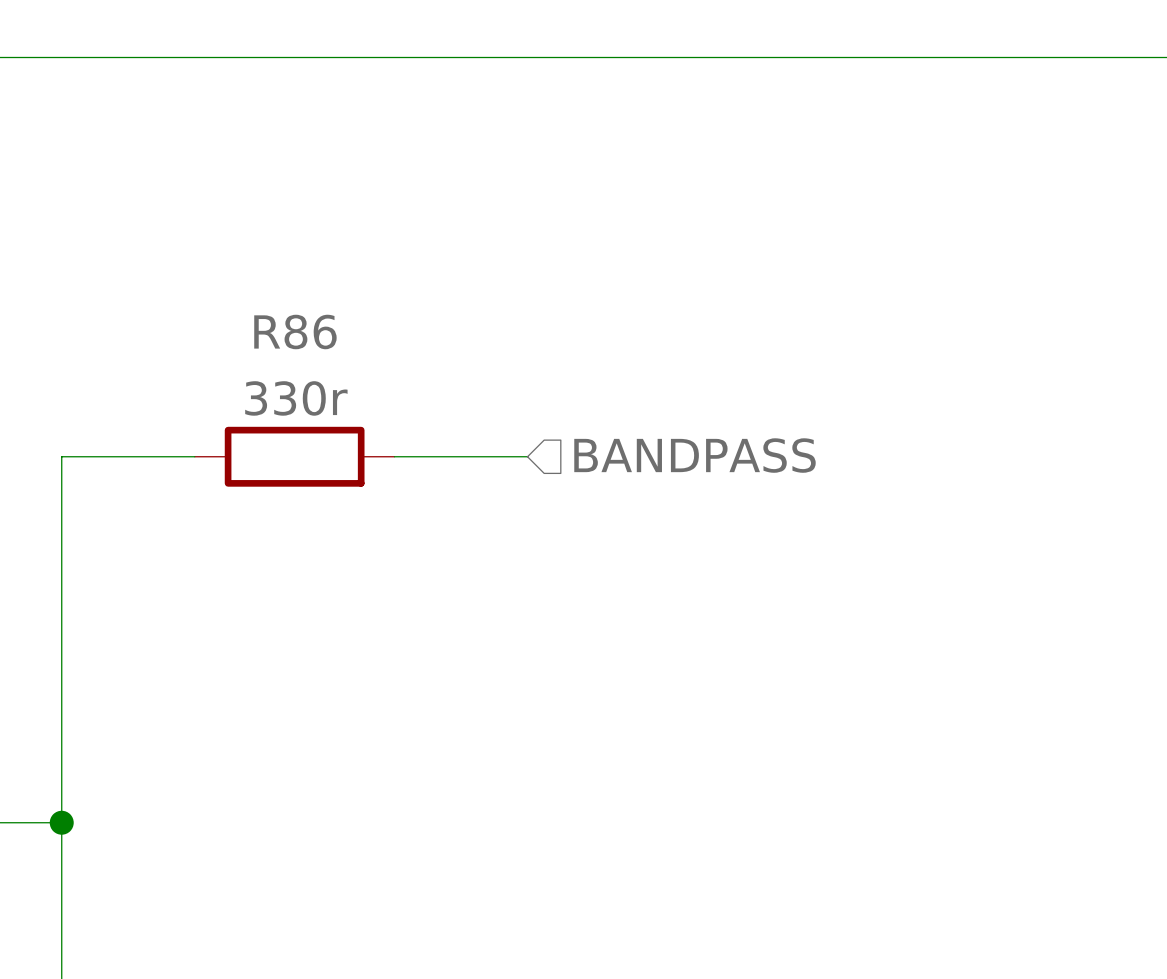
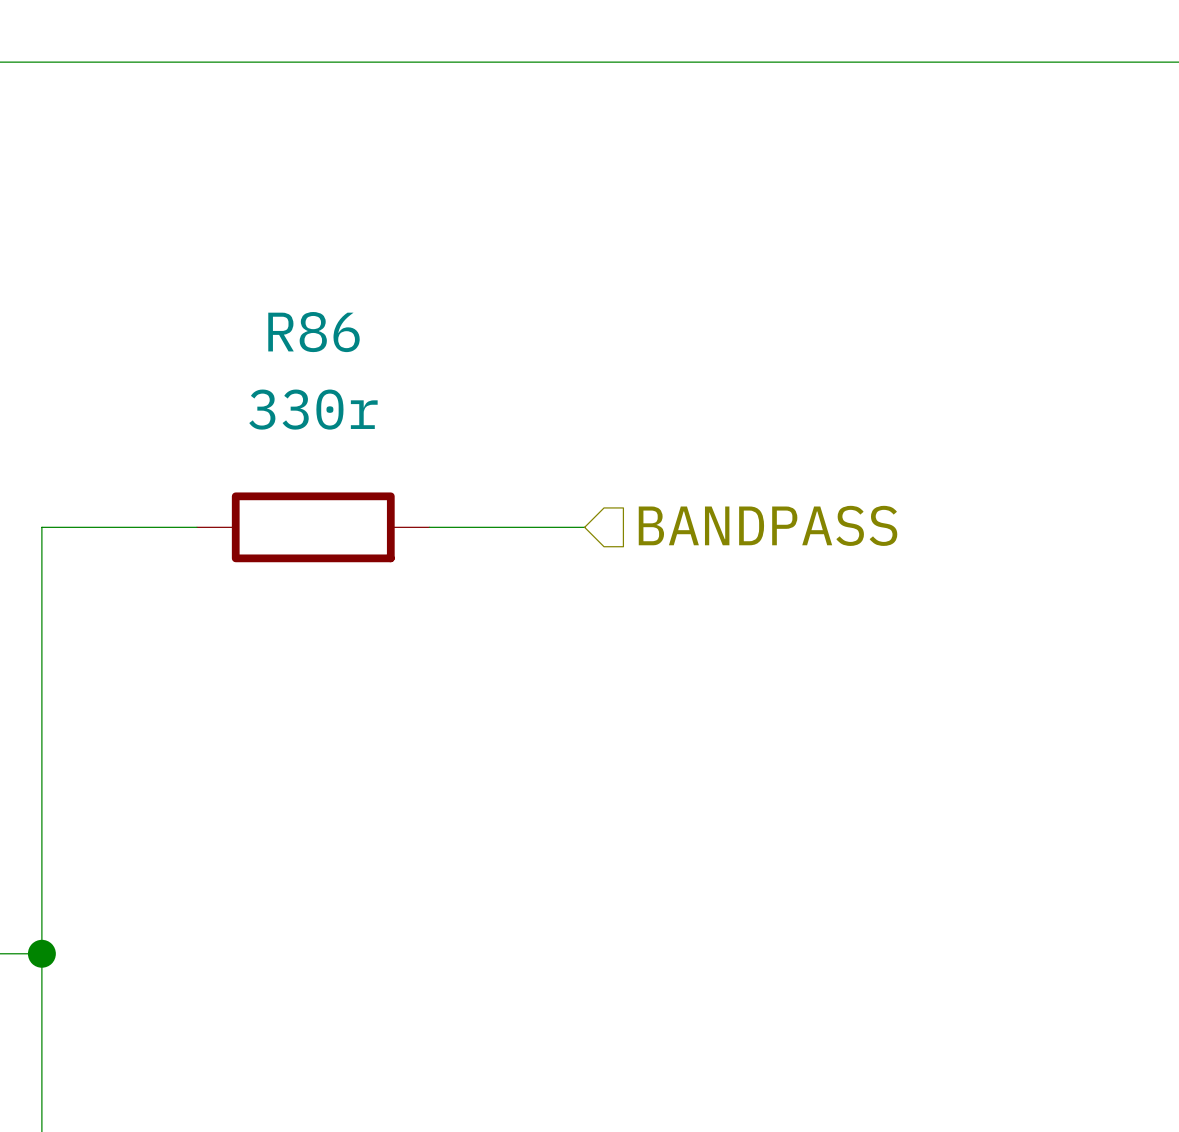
R86 name position: R86 (295, 331) -> R86 (313, 332)
R86 value position: 330r (296, 398) -> 330r (313, 409)

